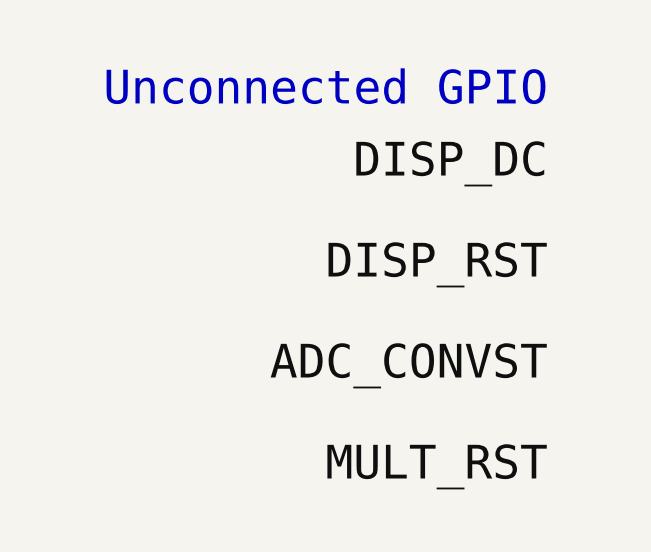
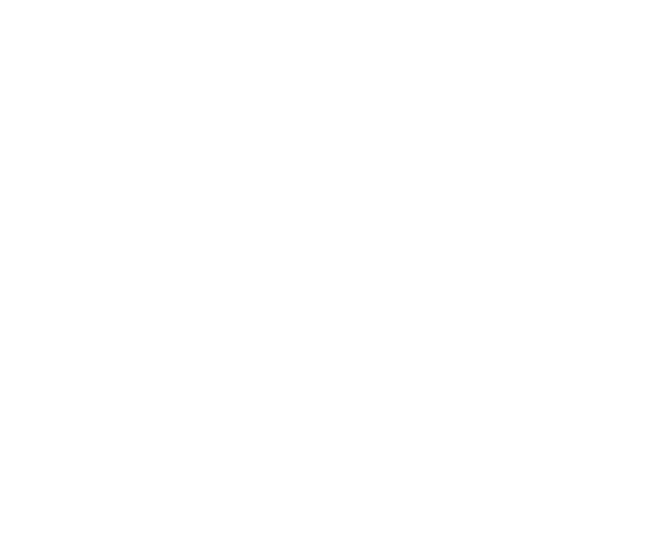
text: Unconnected GPIO (326, 86) -> none
label: DISP_DC (450, 163) -> none
label: DISP_RST (437, 264) -> none
label: ADC_CONVST (408, 365) -> none
label: MULT_RST (437, 466) -> none

